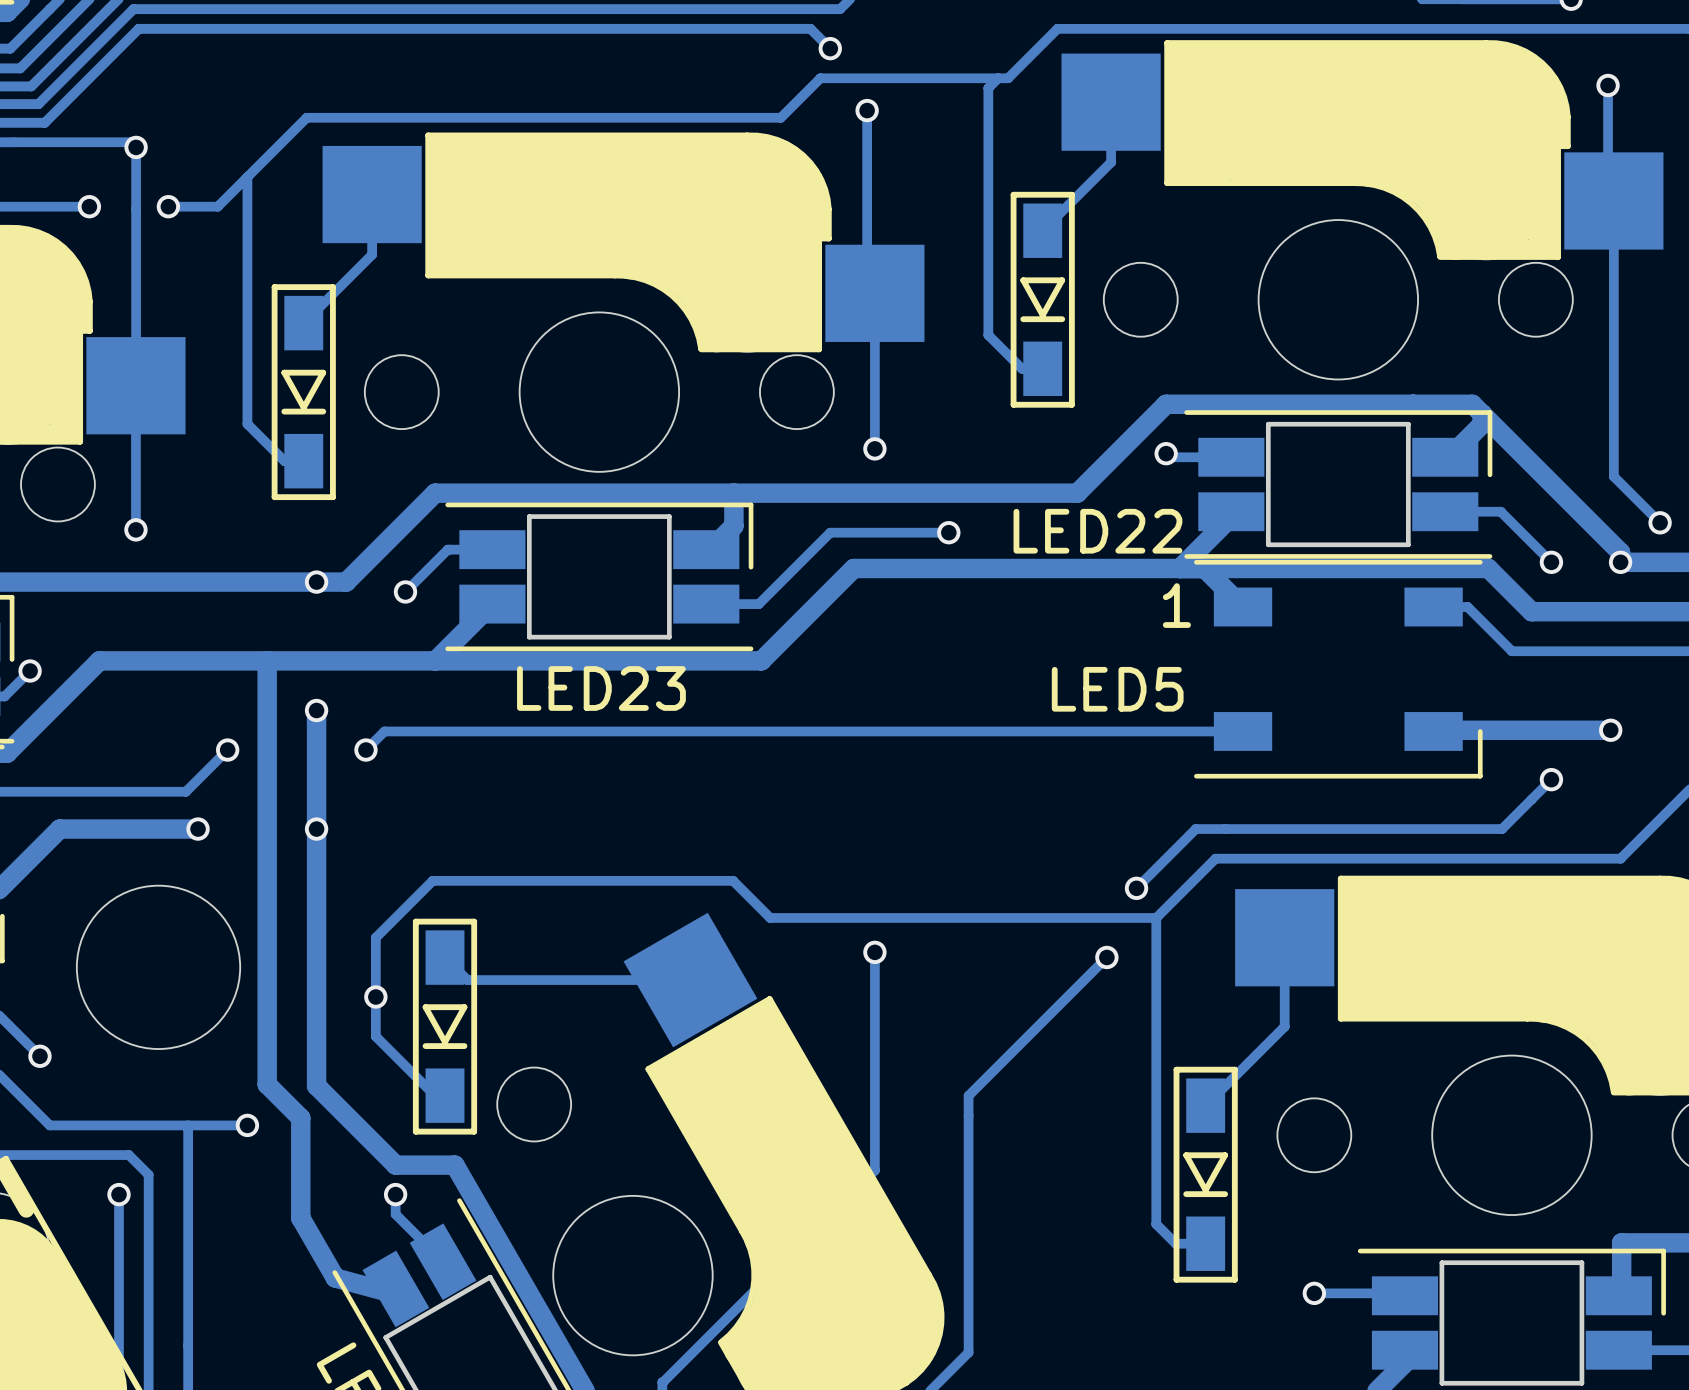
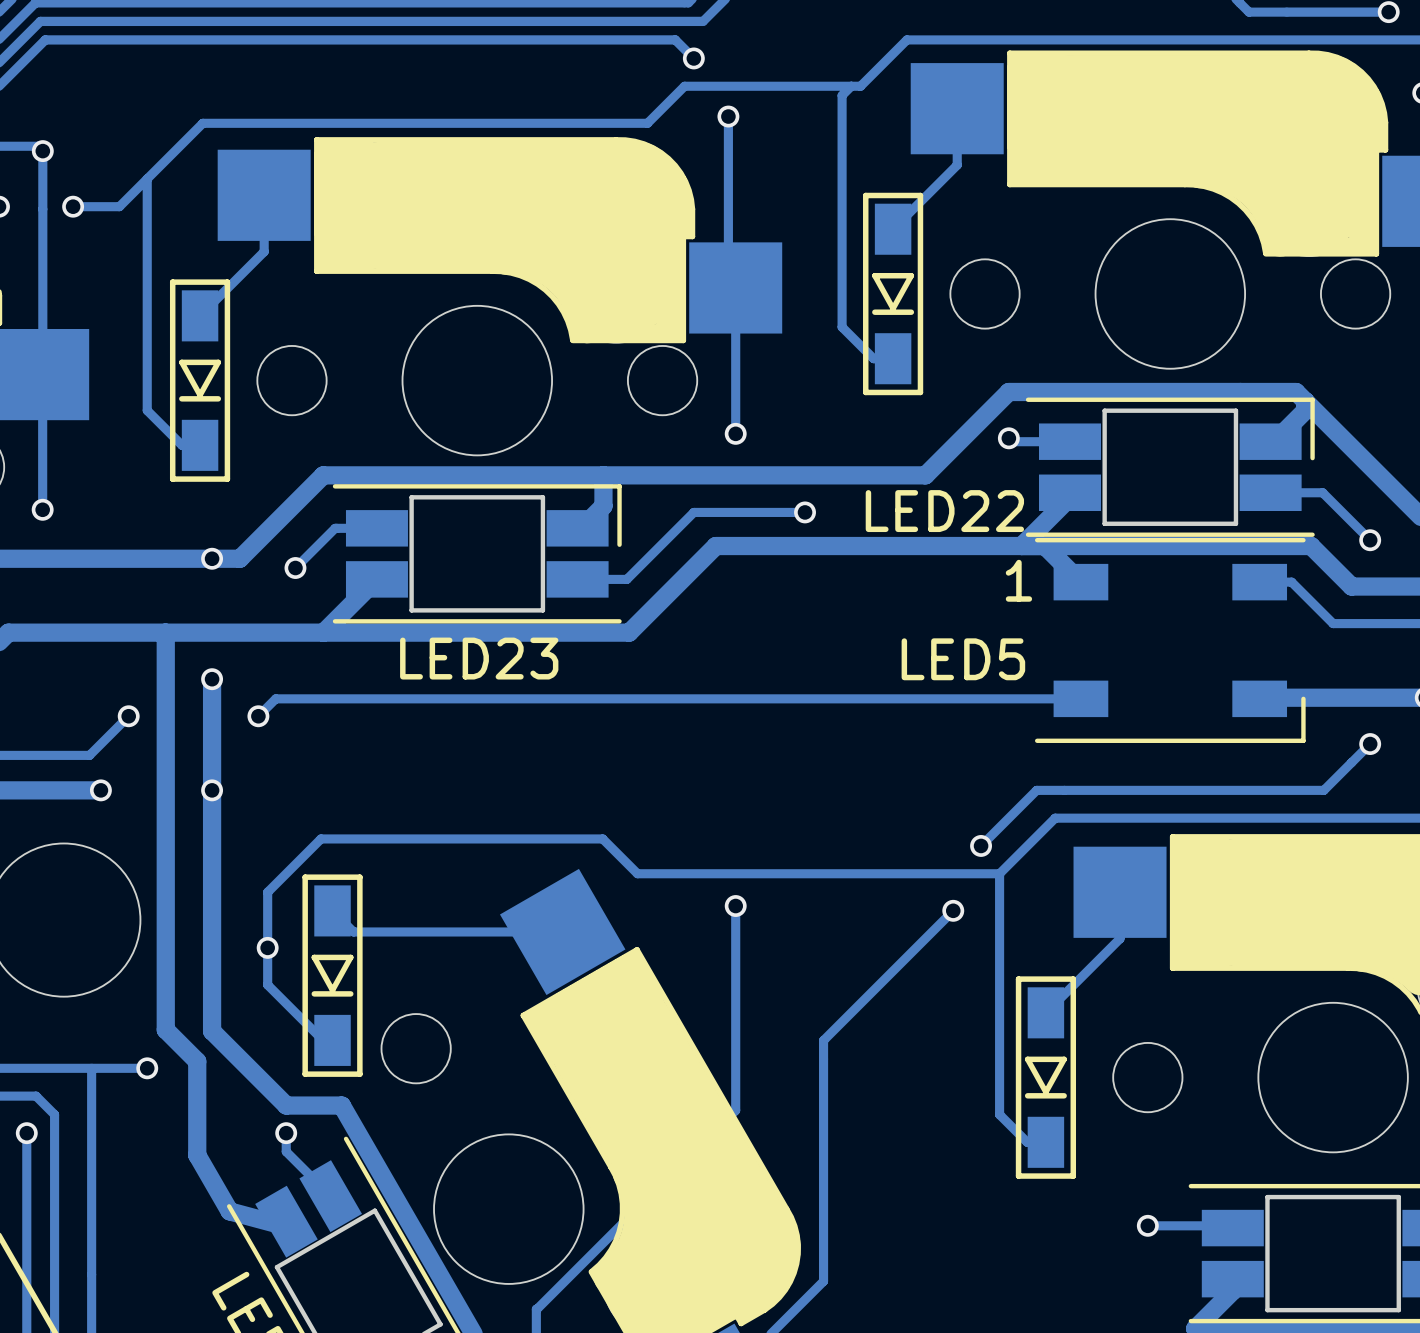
track: (1284, 987) (1284, 1026) (1205, 1105) -> (1120, 938) (1045, 1012)
track: (1156, 1174) (1156, 1224) (1175, 1243) (1205, 1243) -> (999, 1114) (1027, 1142) (1045, 1142)
part position: (1205, 1174) -> (1045, 1077)

